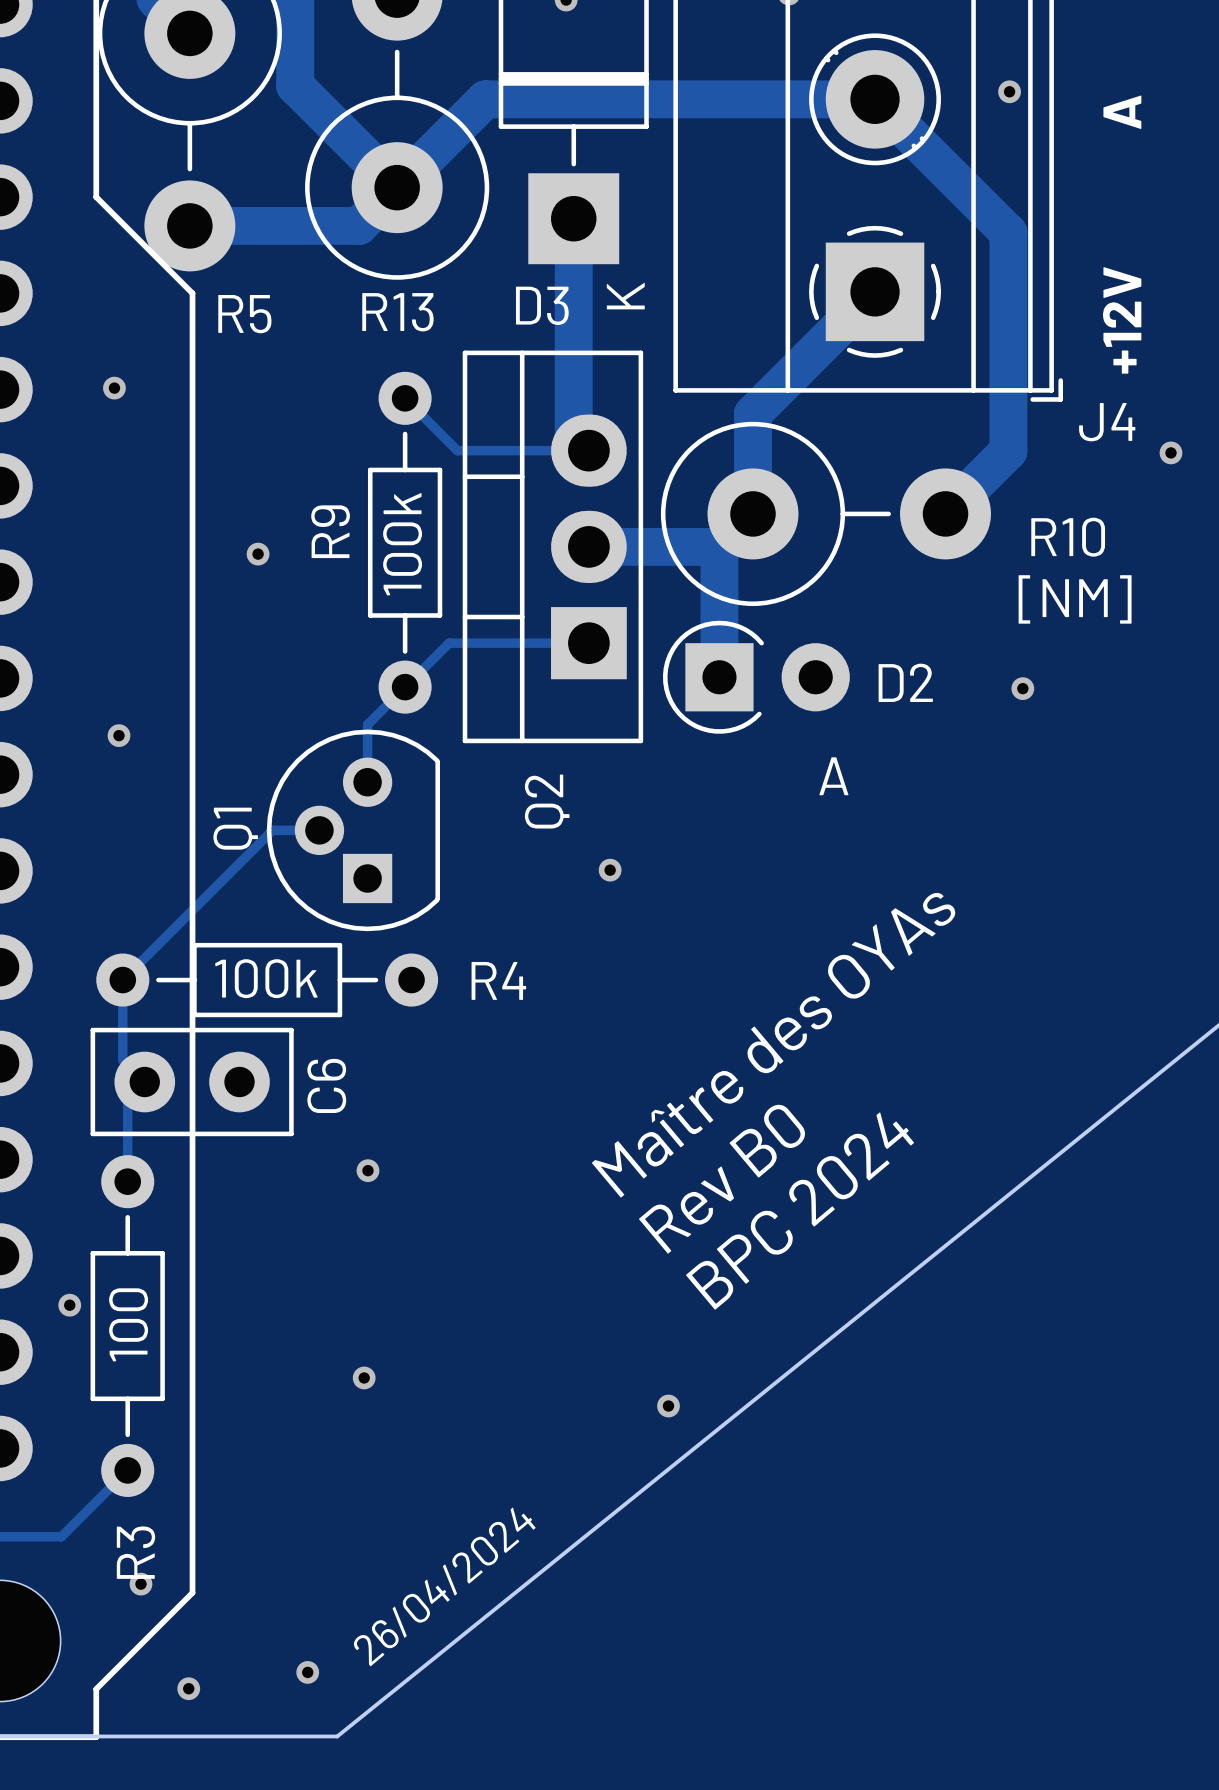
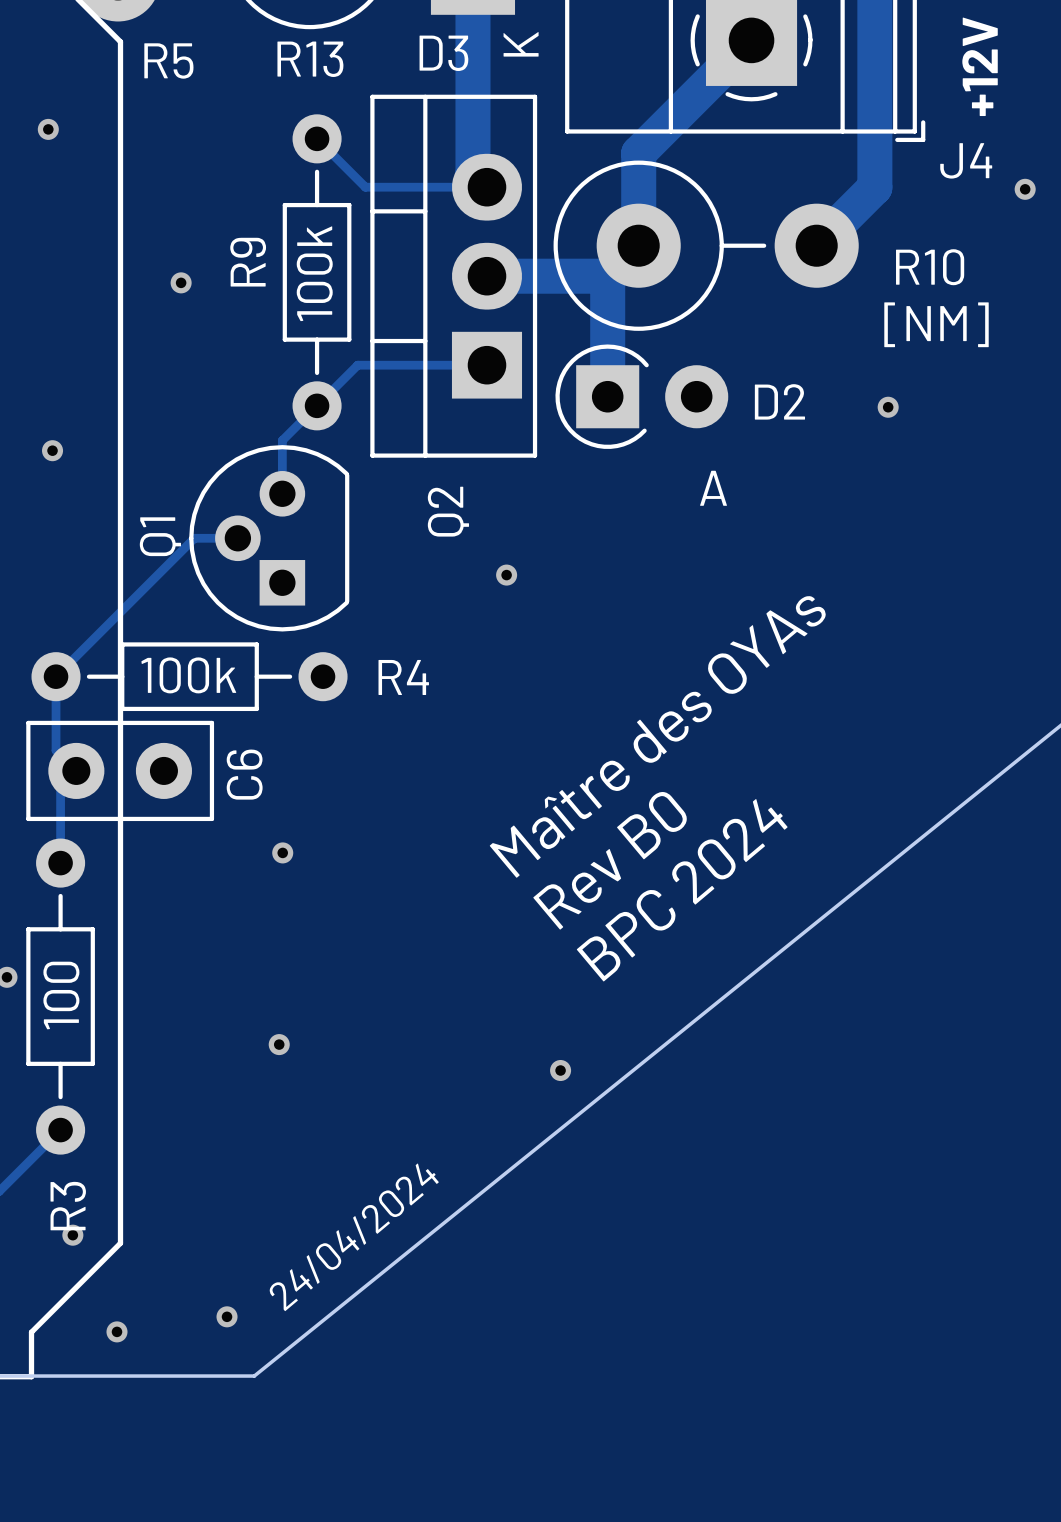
text: 26/04/2024 (444, 1587) -> 24/04/2024 (354, 1237)

